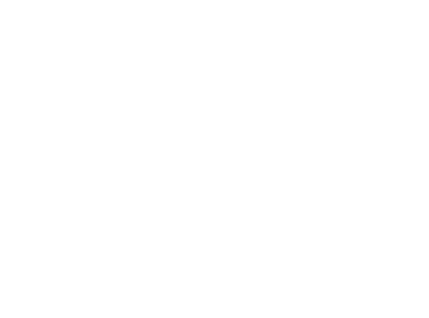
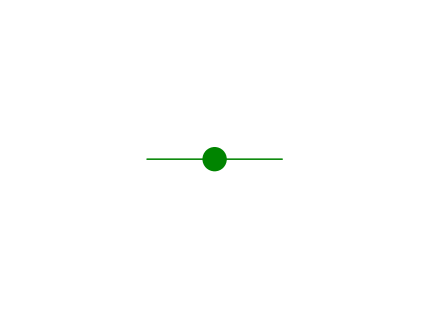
wire: none -> (146, 159) (282, 159)
junction: none -> (214, 159)

